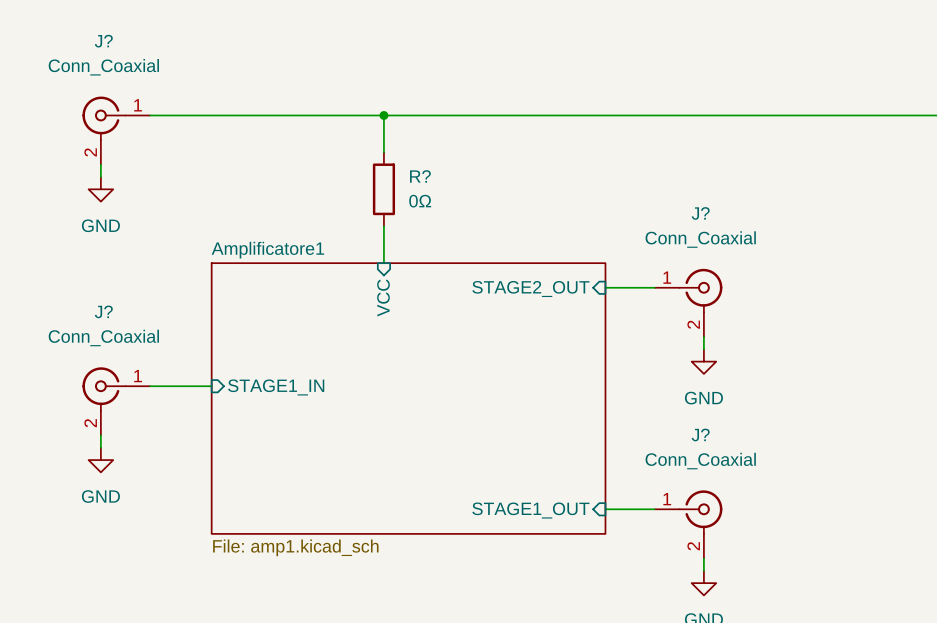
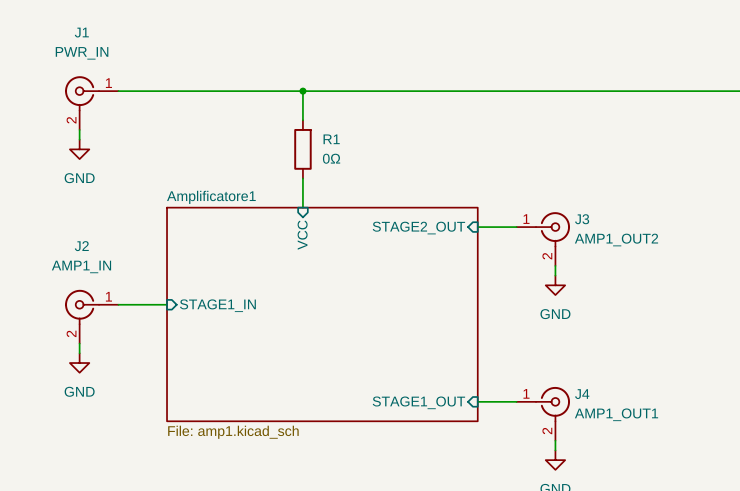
J? name: J? (103, 41) -> J1 (81, 32)
J? value: Conn_Coaxial (103, 67) -> PWR_IN (82, 53)
R? name: R? (420, 176) -> R1 (331, 139)
J? name: J? (700, 213) -> J3 (582, 219)
J? value: Conn_Coaxial (700, 239) -> AMP1_OUT2 (616, 239)
J? name: J? (103, 311) -> J2 (81, 246)
J? value: Conn_Coaxial (103, 337) -> AMP1_IN (81, 266)
J? name: J? (700, 434) -> J4 (582, 394)
J? value: Conn_Coaxial (700, 461) -> AMP1_OUT1 (616, 414)

